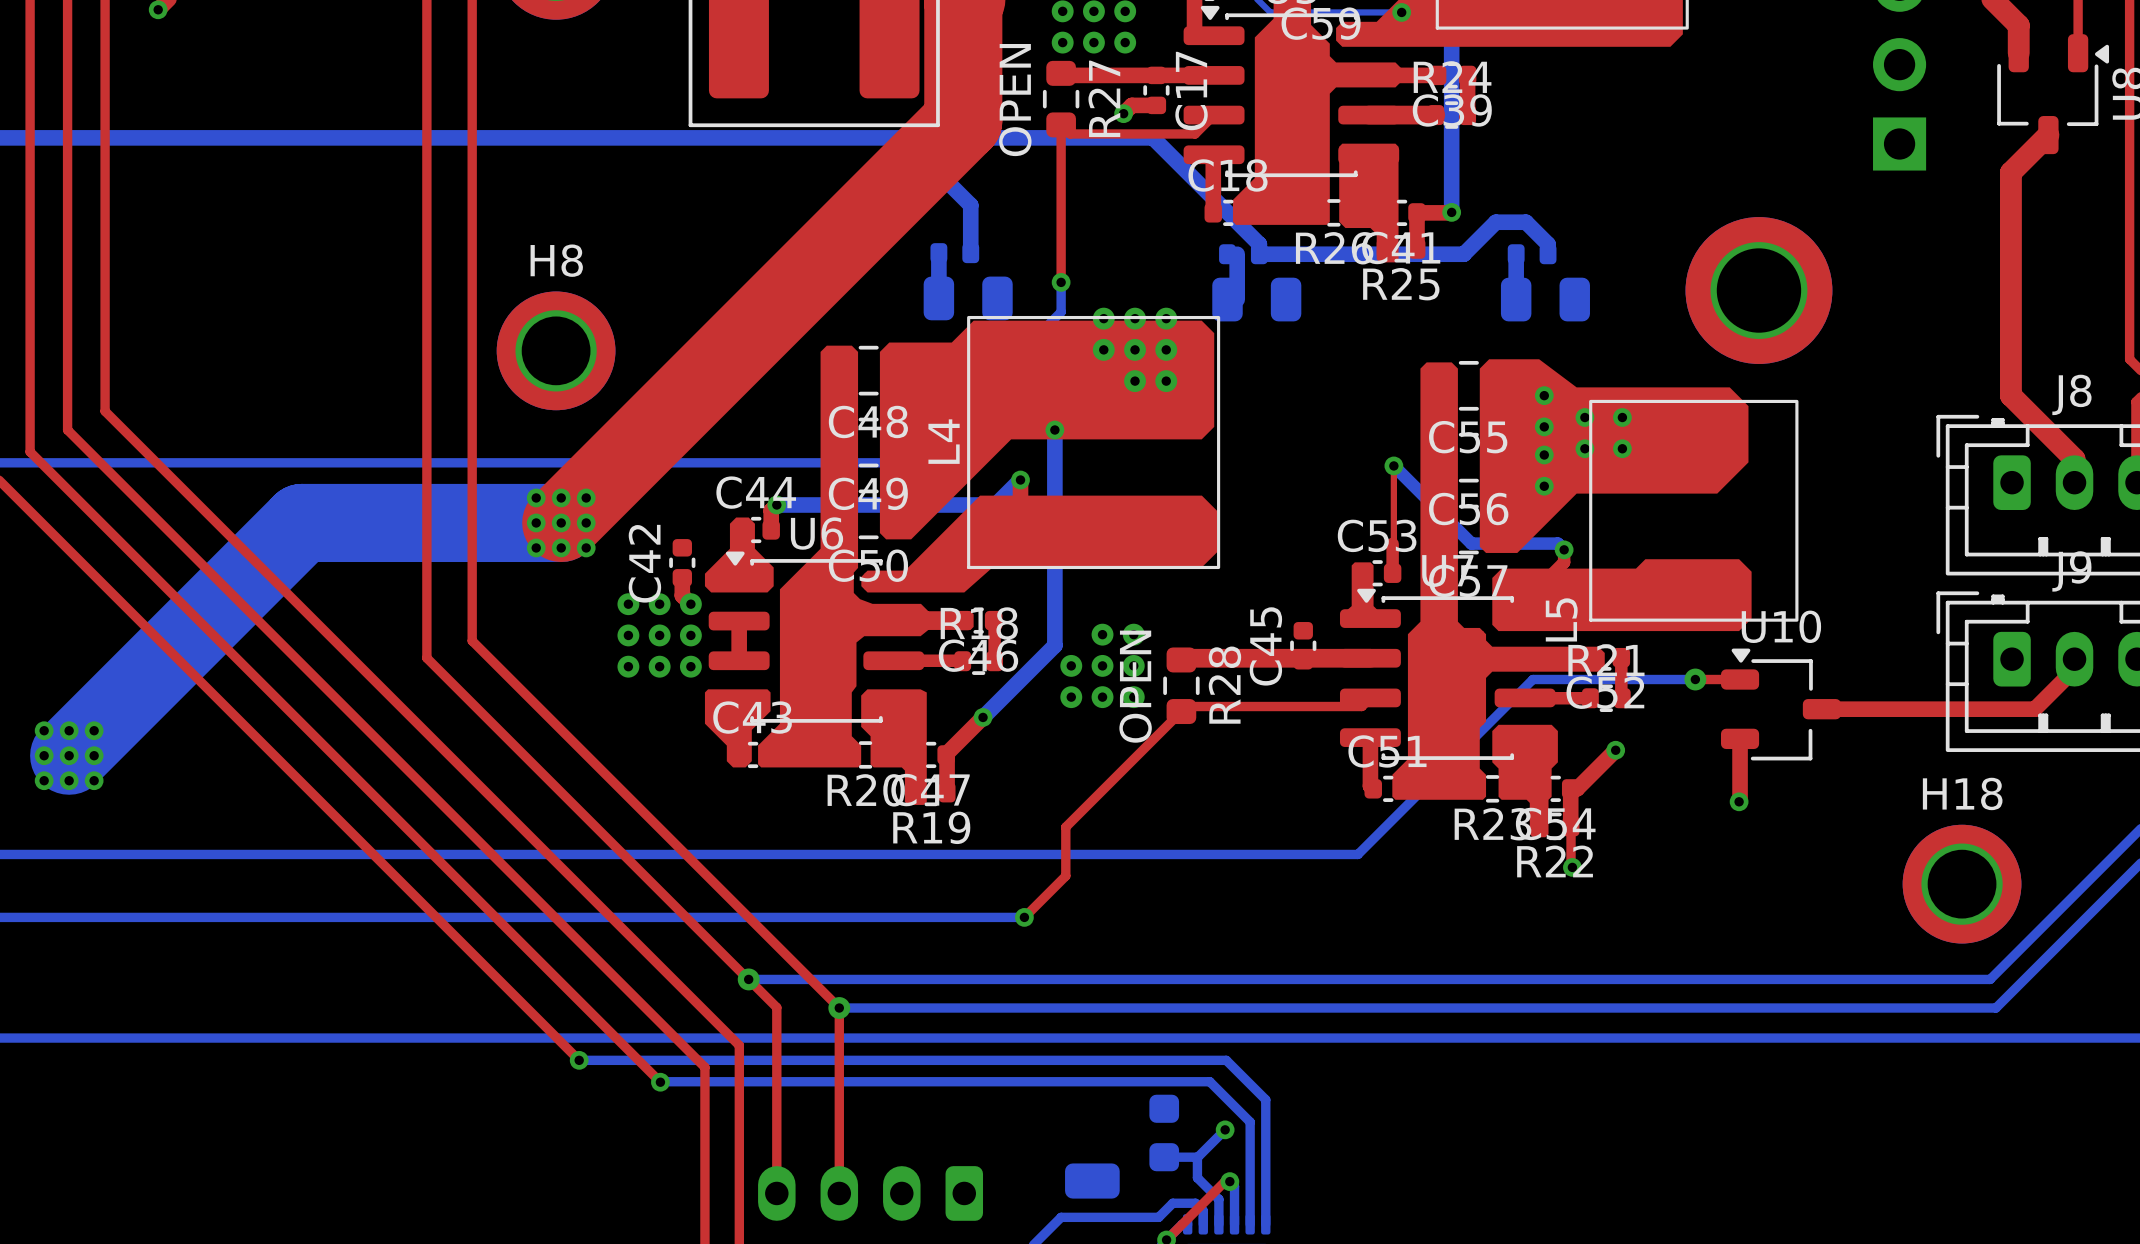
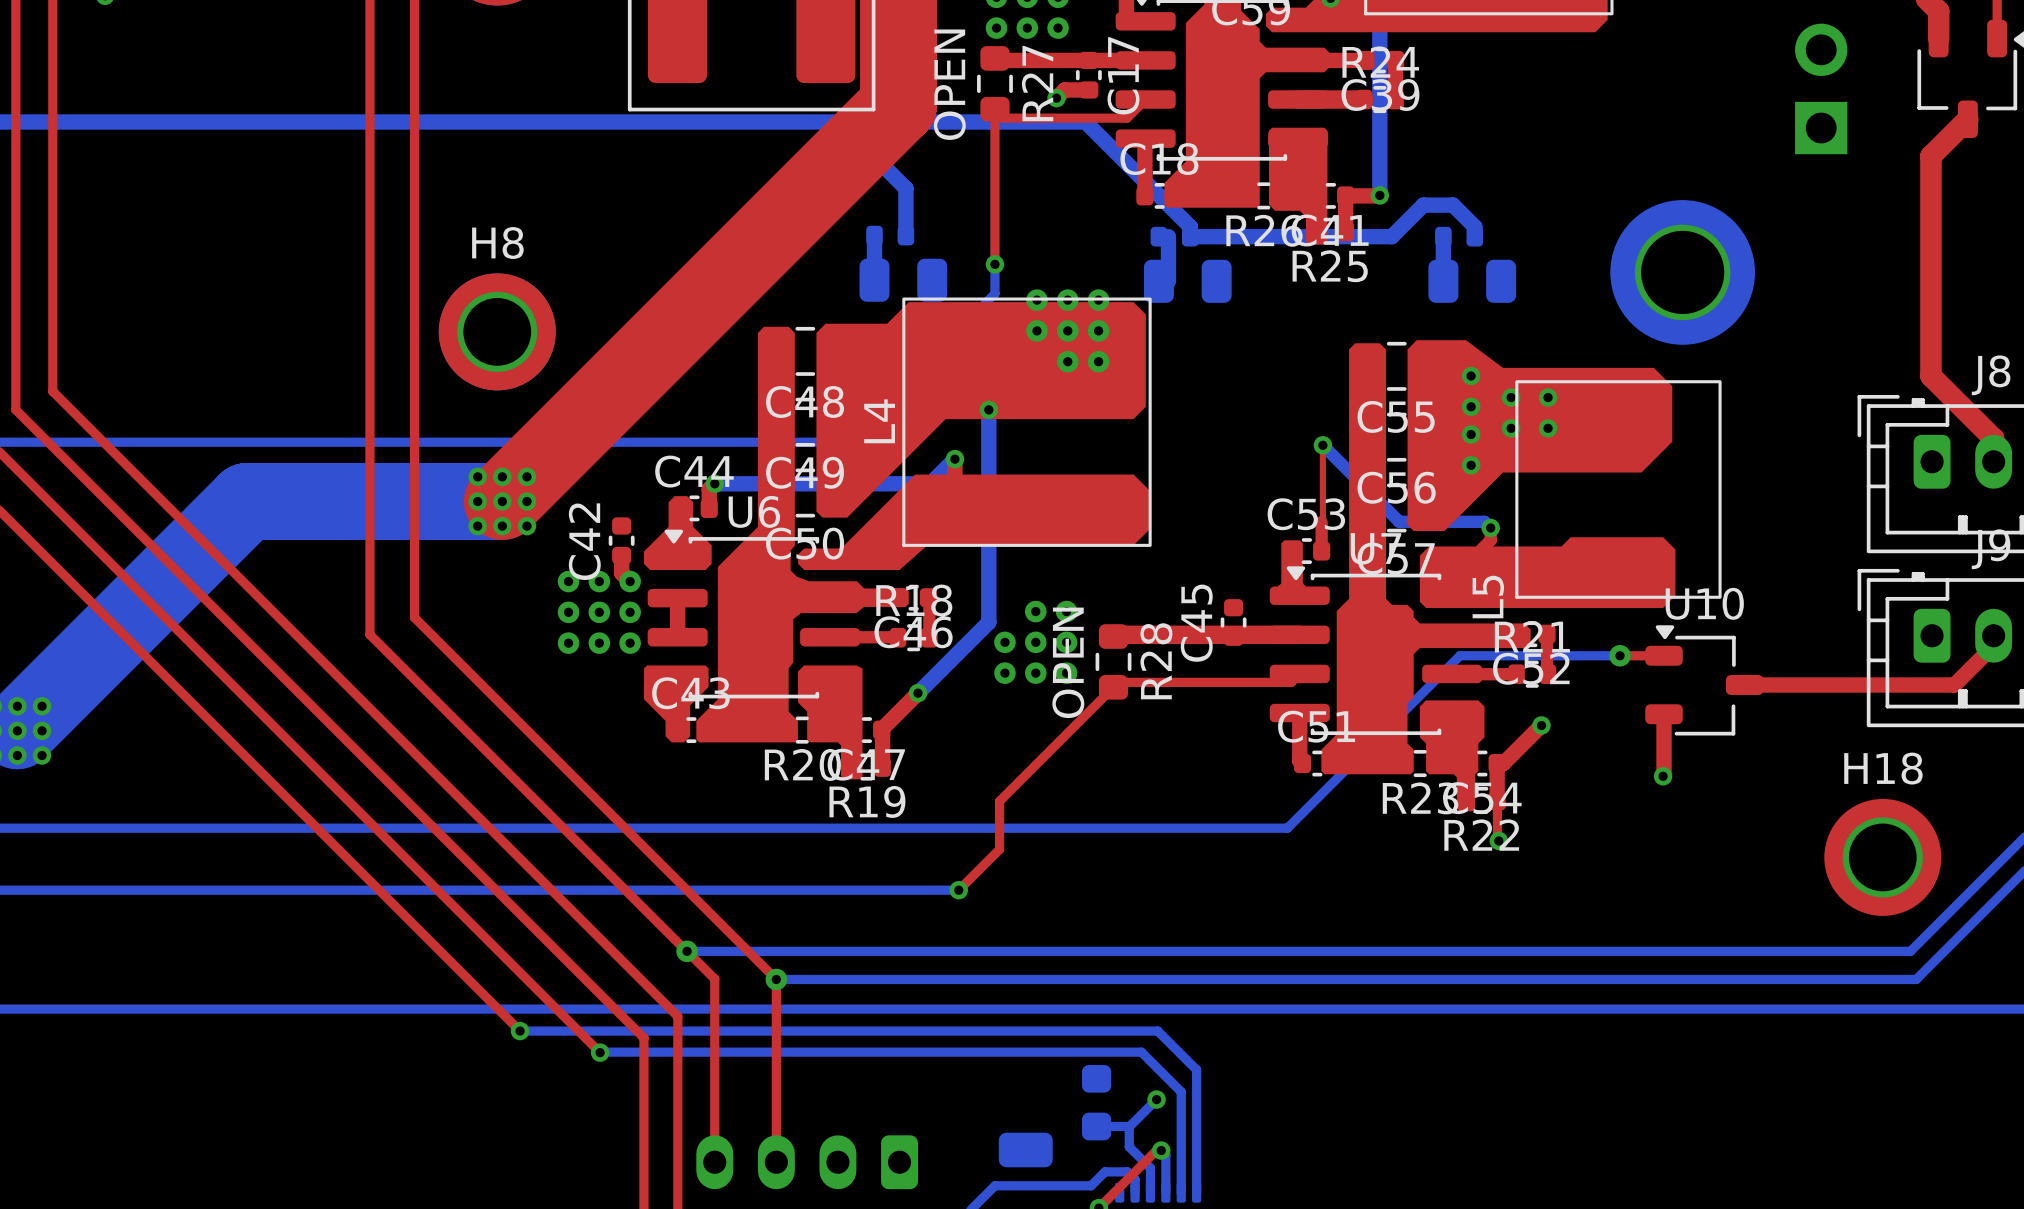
part footprint: [1685, 217, 1833, 364] -> [1610, 200, 1756, 345]
H18 footprint: [1902, 824, 2022, 944] -> [1824, 798, 1942, 916]

